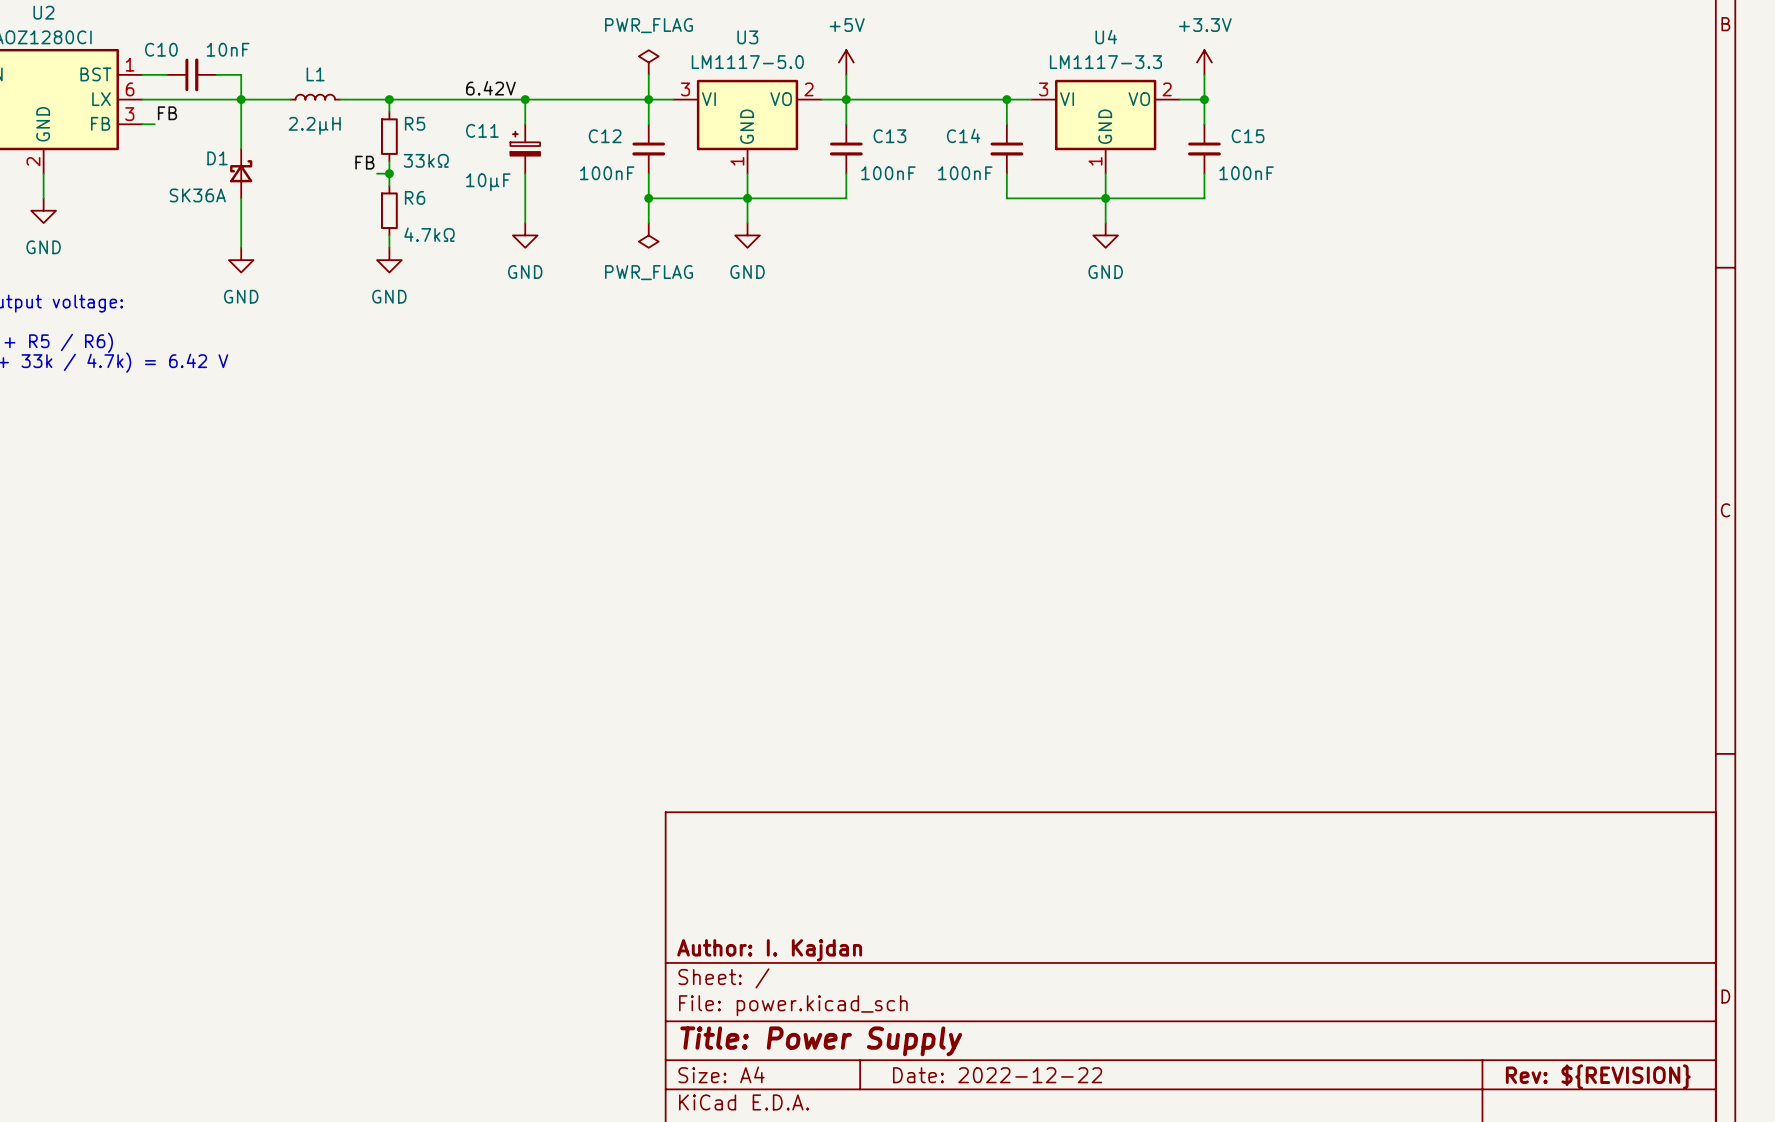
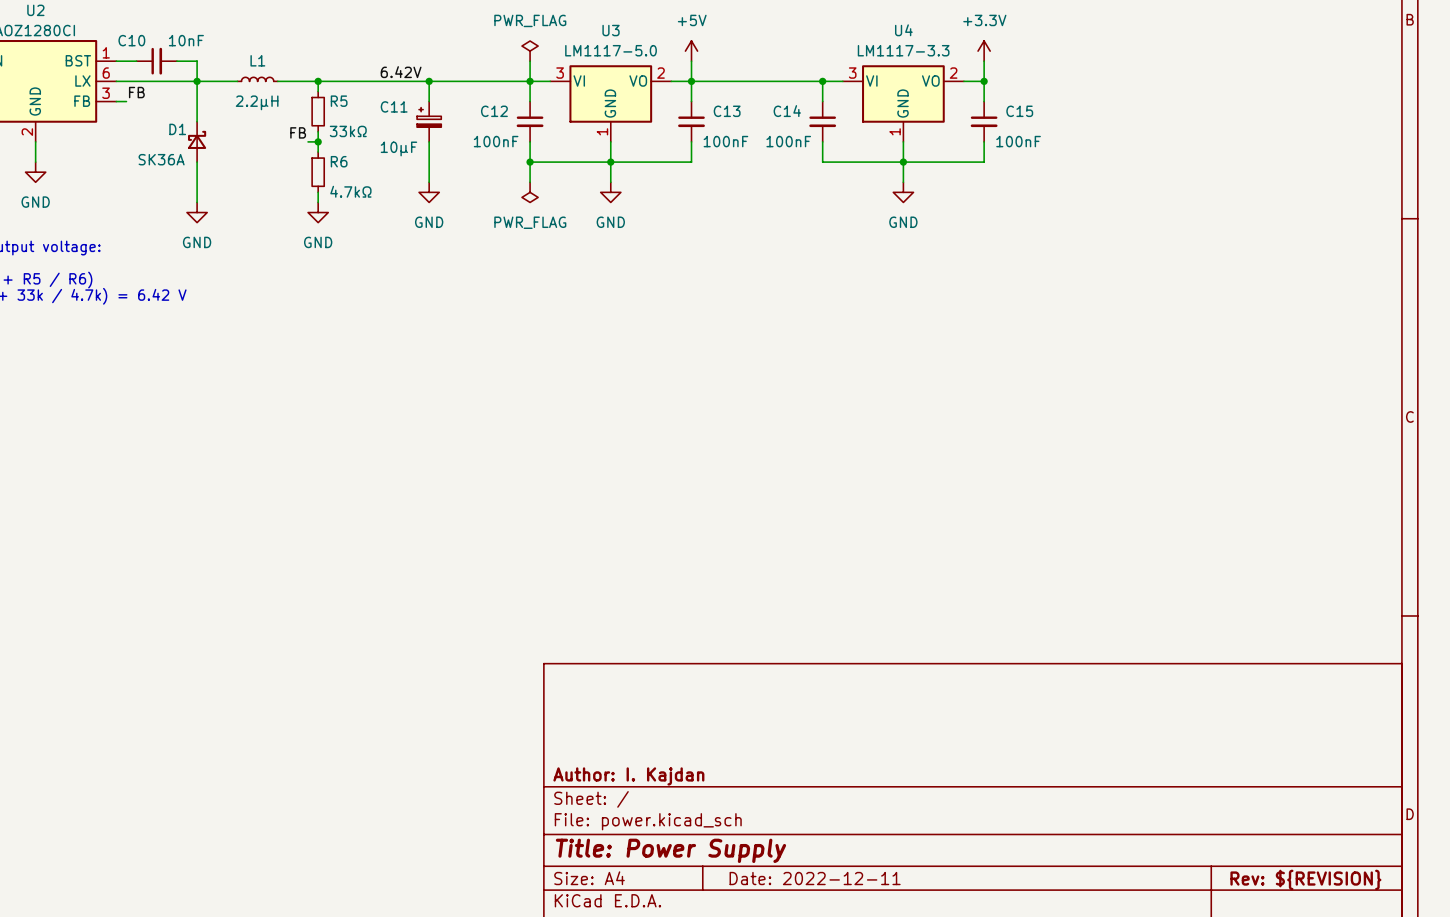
title block: Date: 2022-12-22 (997, 1075) -> Date: 2022-12-11 (815, 878)

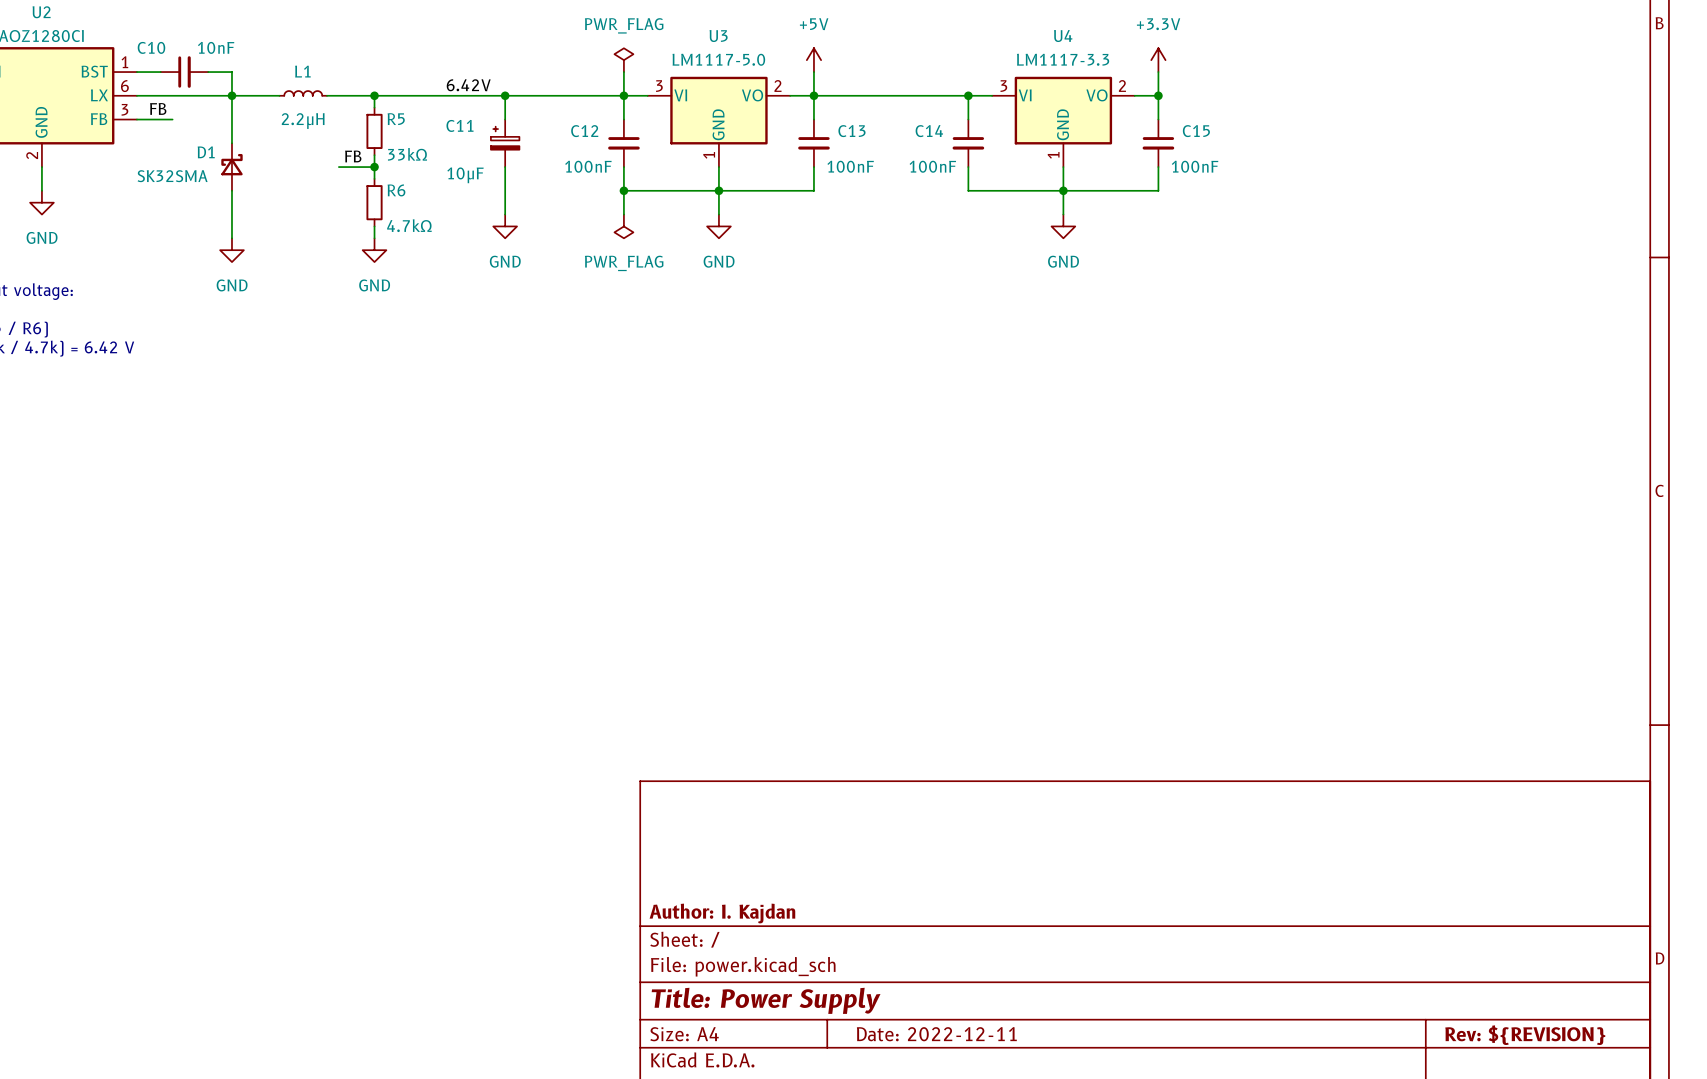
wire: none -> (148, 119) (172, 119)
wire: none -> (338, 167) (362, 167)
D1 value: SK36A (161, 159) -> SK32SMA (172, 176)

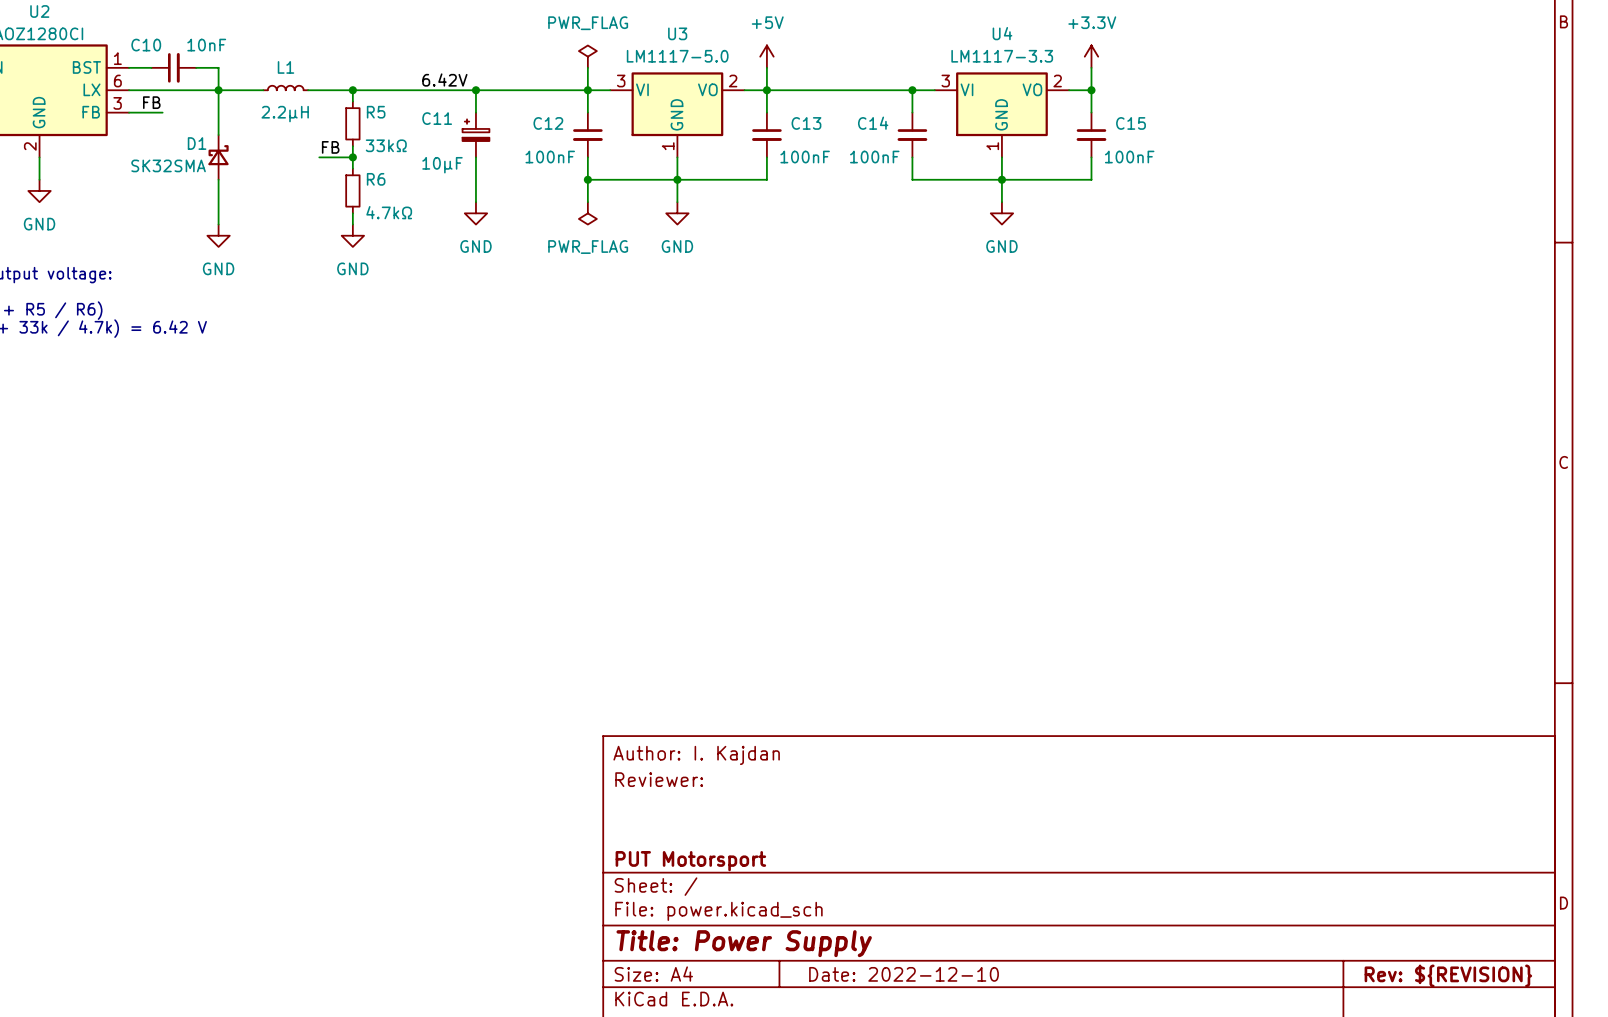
title block: none -> Author: I. Kajdan (696, 755)
title block: none -> Reviewer: (659, 779)
title block: Author: I. Kajdan (722, 913) -> PUT Motorsport (690, 861)
title block: Date: 2022-12-11 (936, 1034) -> Date: 2022-12-10 (904, 974)

